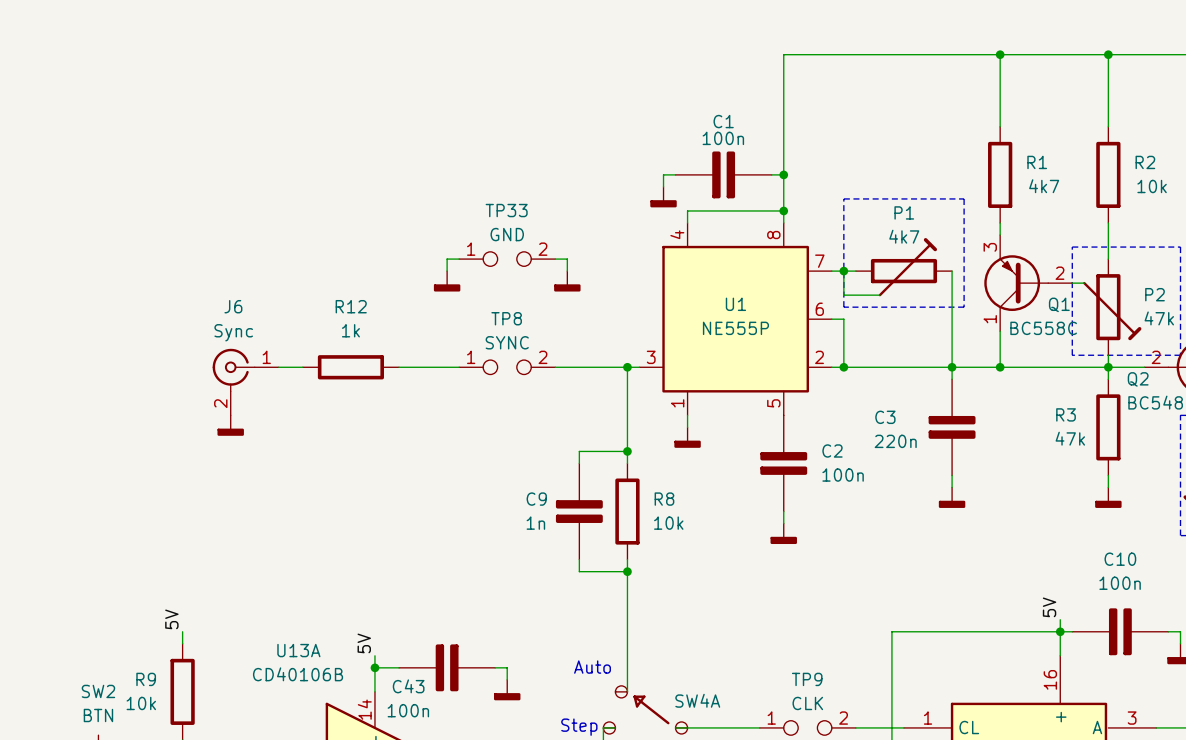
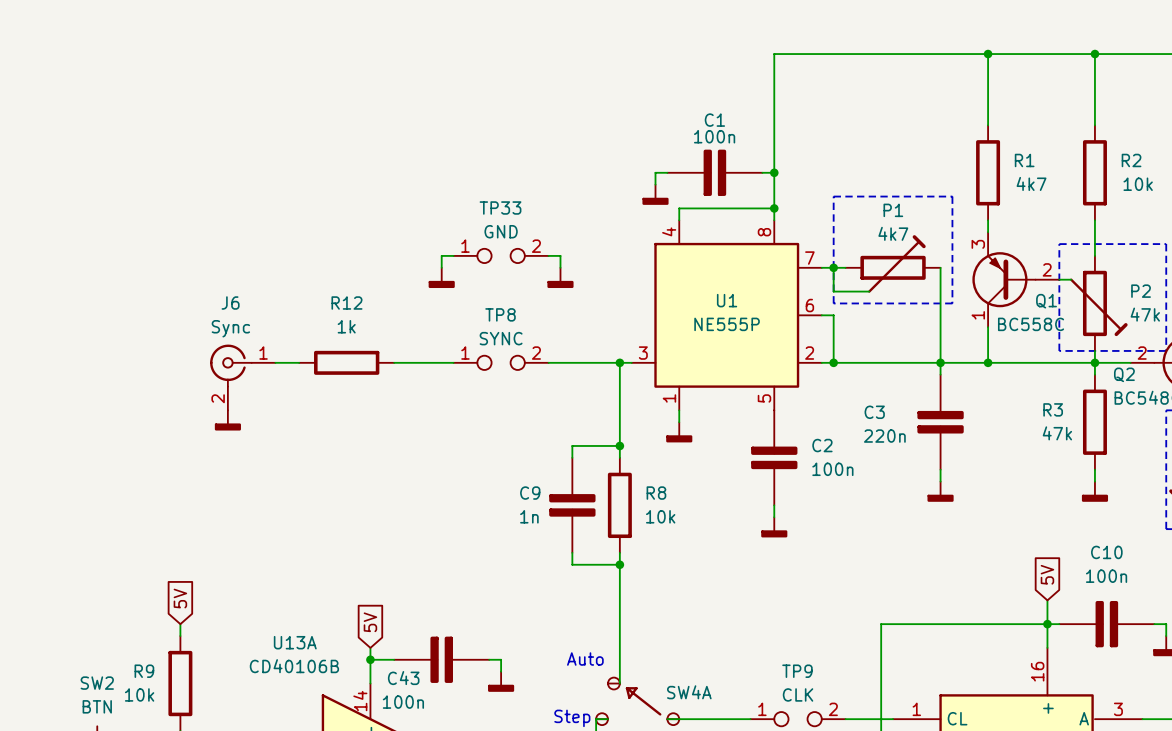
global label: none -> 5V (1047, 574)
global label: none -> 5V (180, 598)
label: 5V (1049, 607) -> none
wire: none -> (1047, 600) (1047, 612)
label: 5V (171, 619) -> none
global label: none -> 5V (370, 622)
label: 5V (364, 643) -> none

